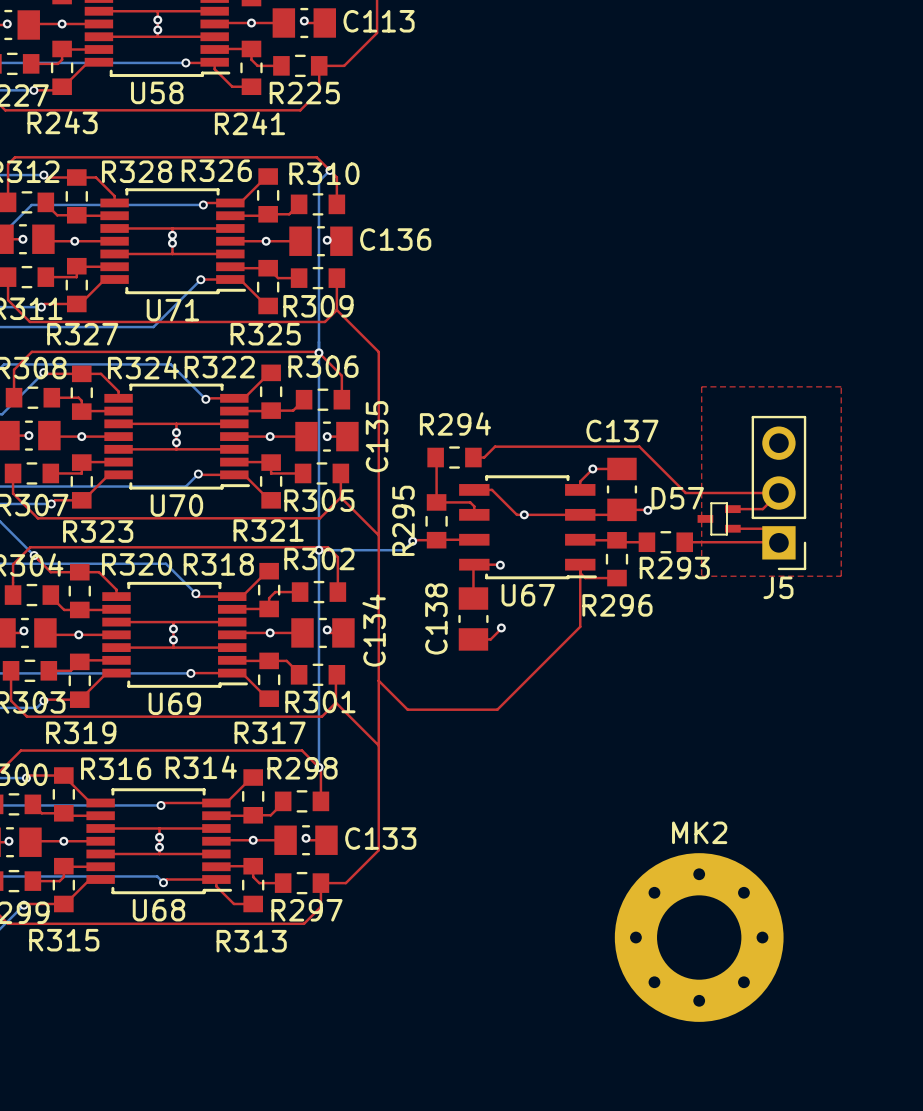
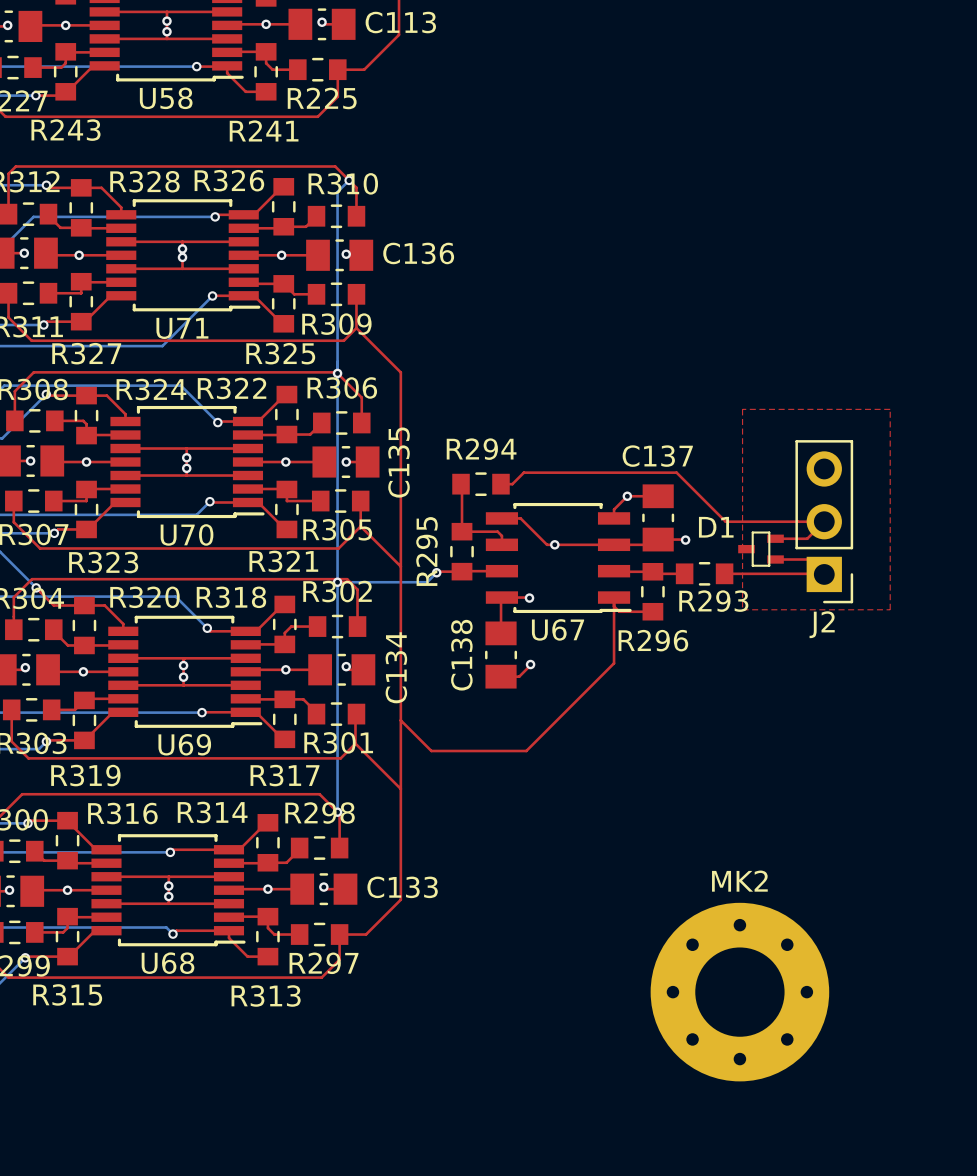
D57 name: D57 (677, 498) -> D1 (716, 527)
J5 name: J5 (778, 587) -> J2 (822, 624)

